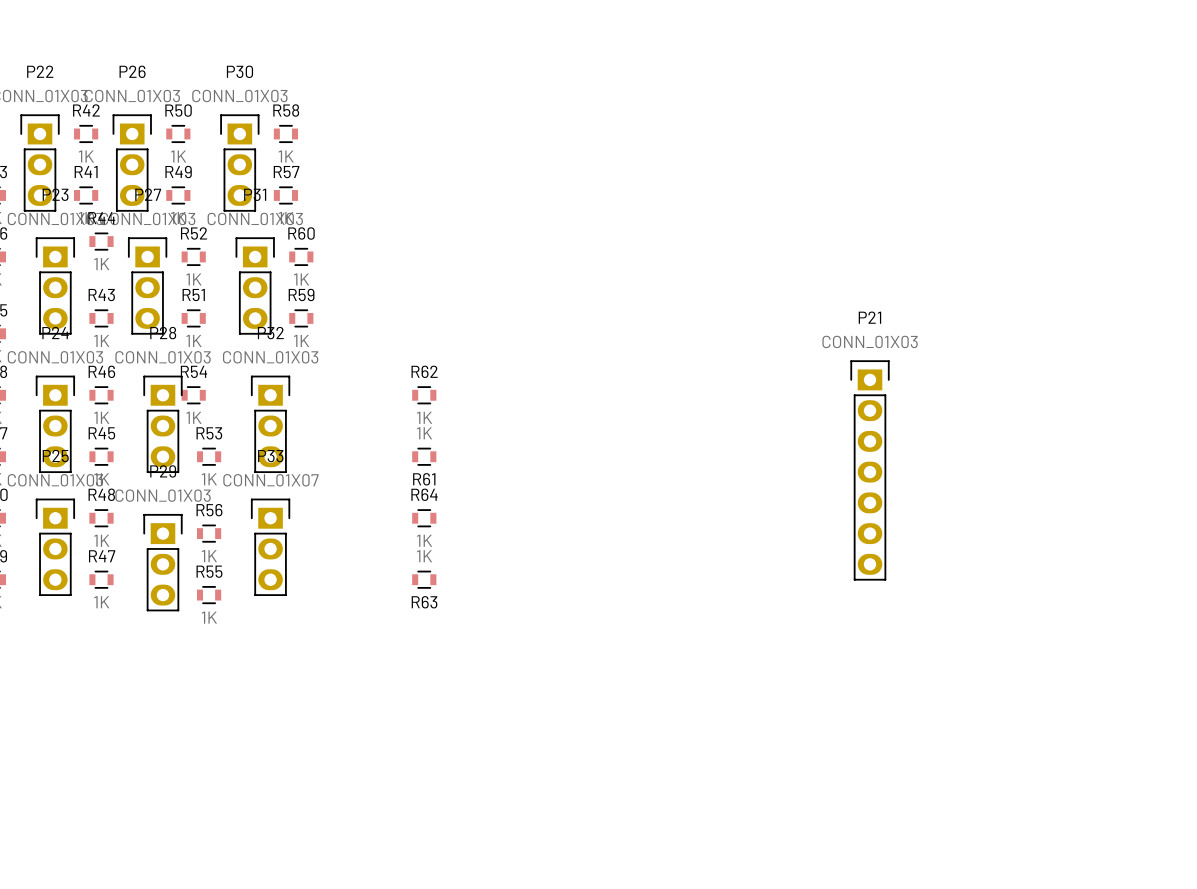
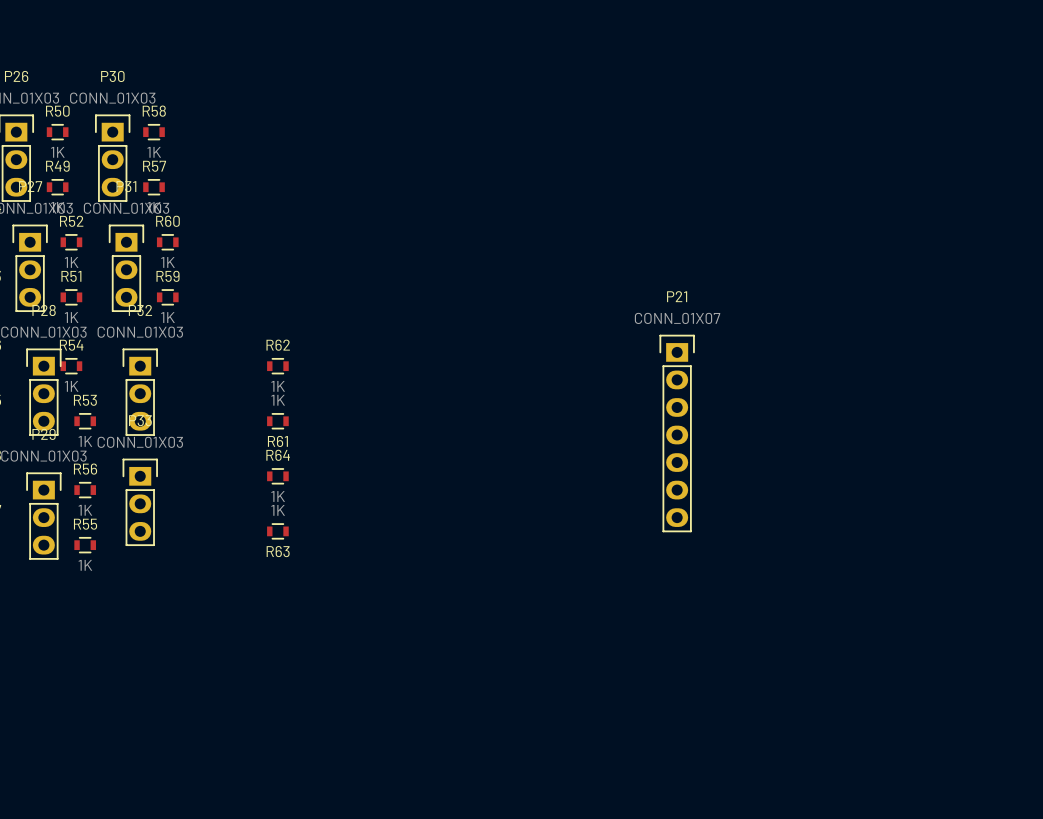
P21 value: CONN_01X03 (870, 341) -> CONN_01X07 (677, 318)
P33 value: CONN_01X07 (271, 480) -> CONN_01X03 (140, 442)

